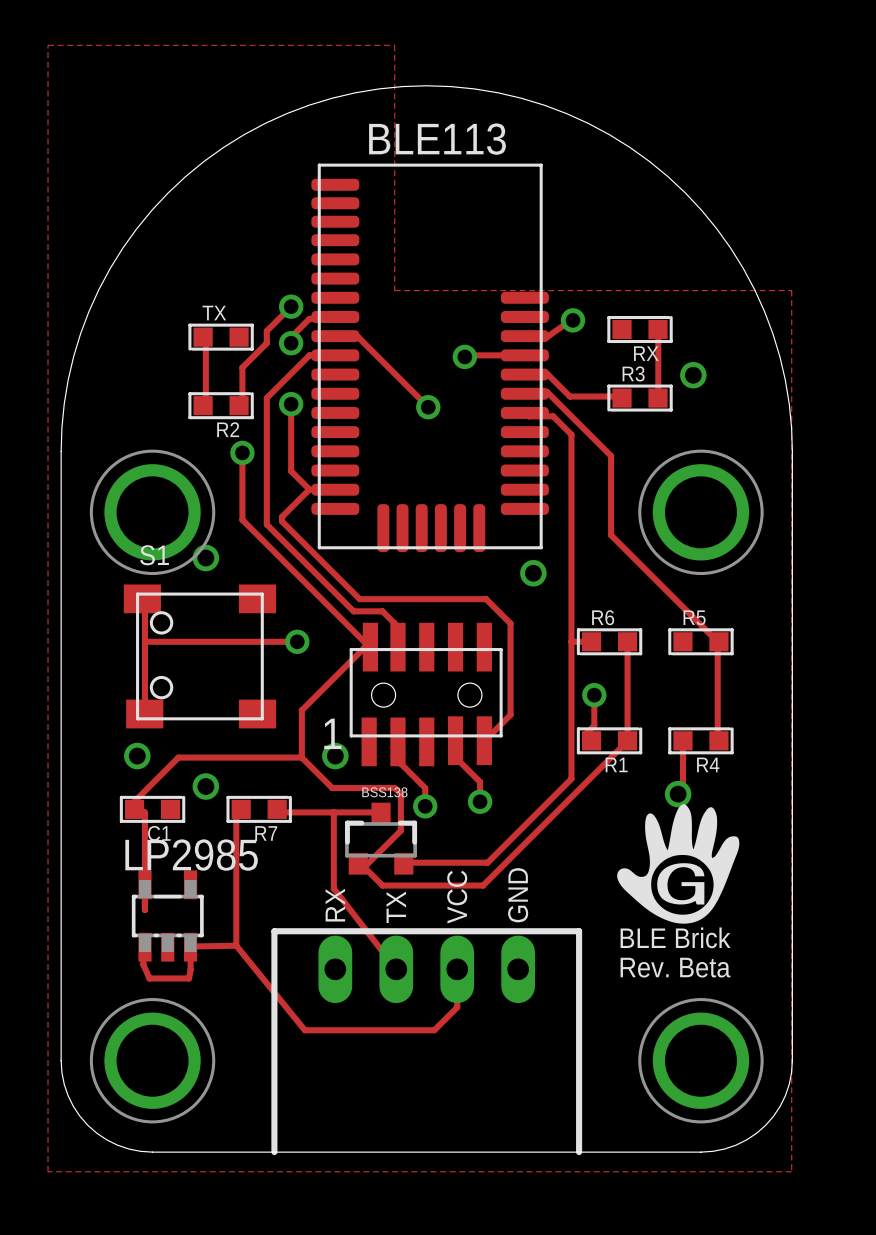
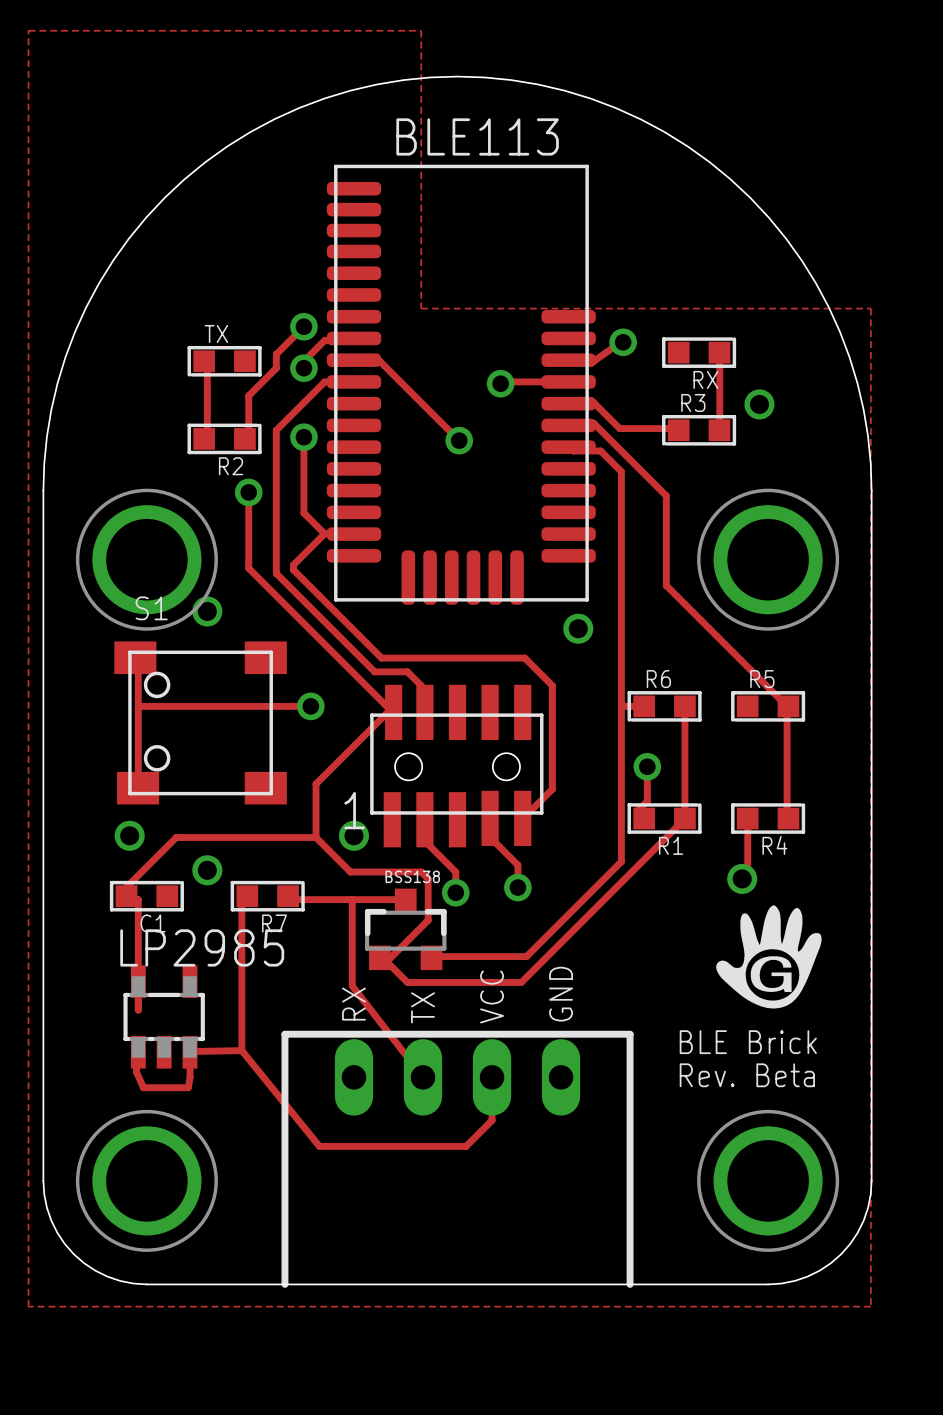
drawing shape: [617, 804, 740, 924] -> [716, 905, 822, 1009]

